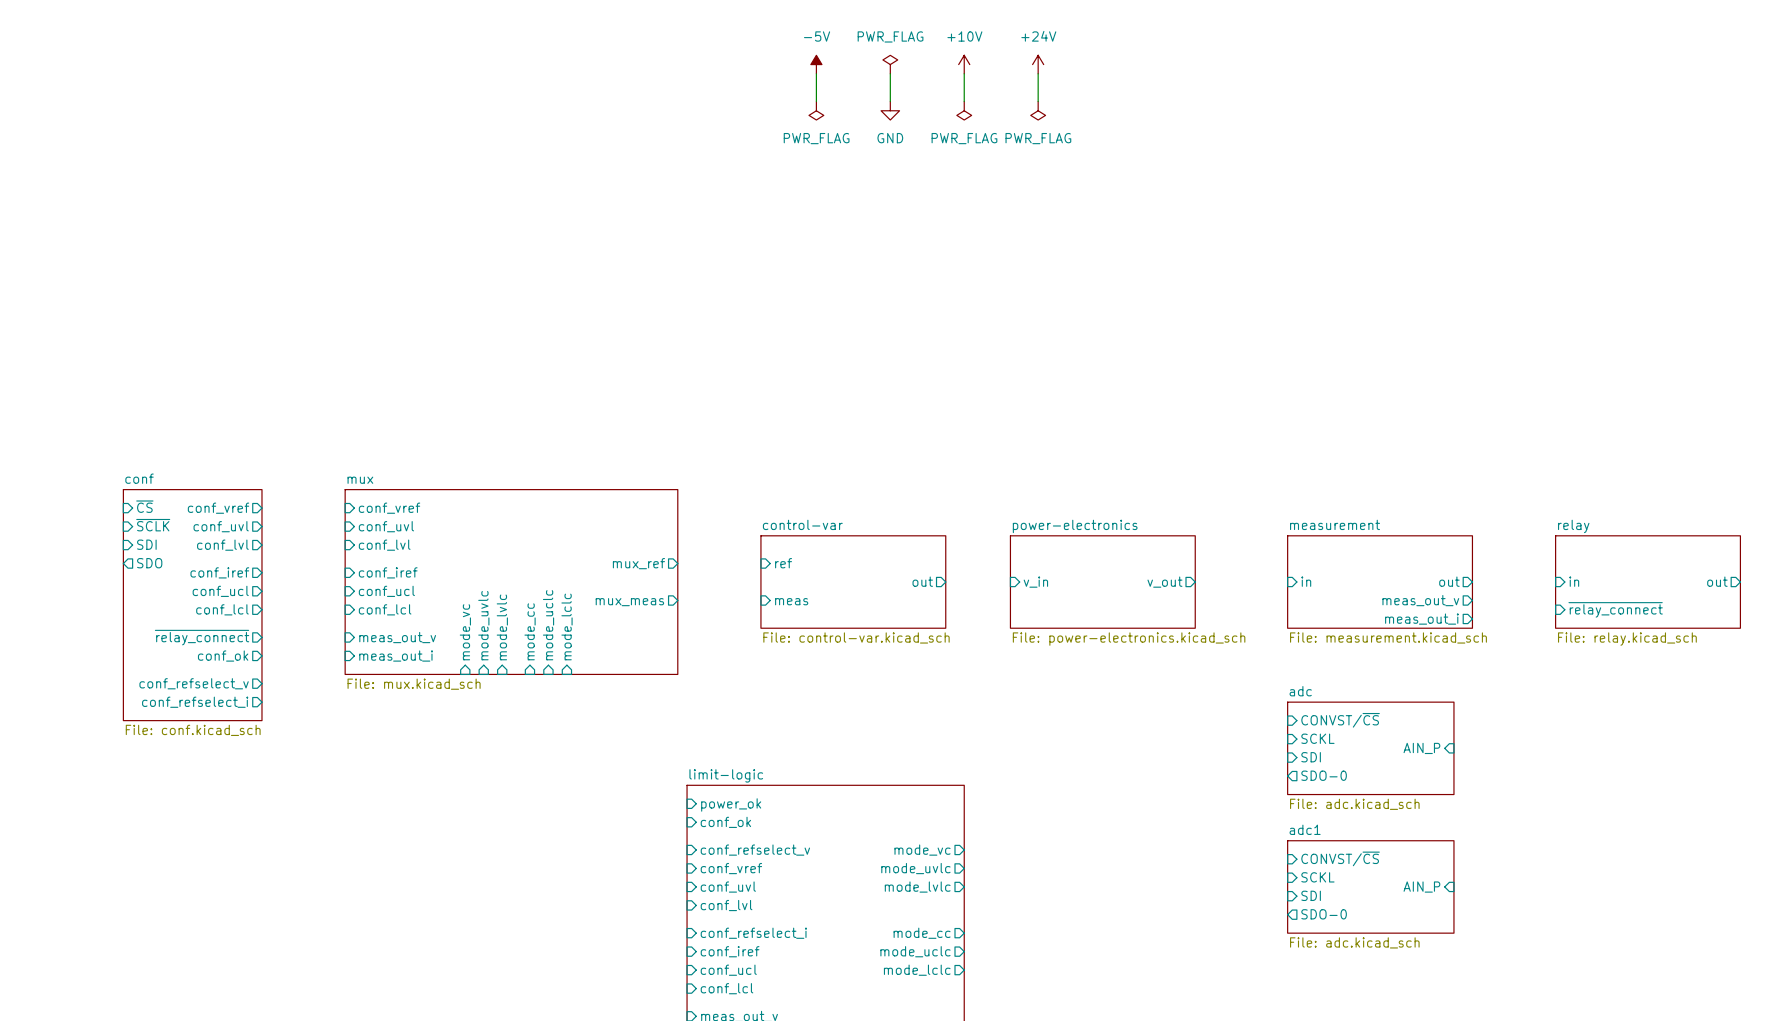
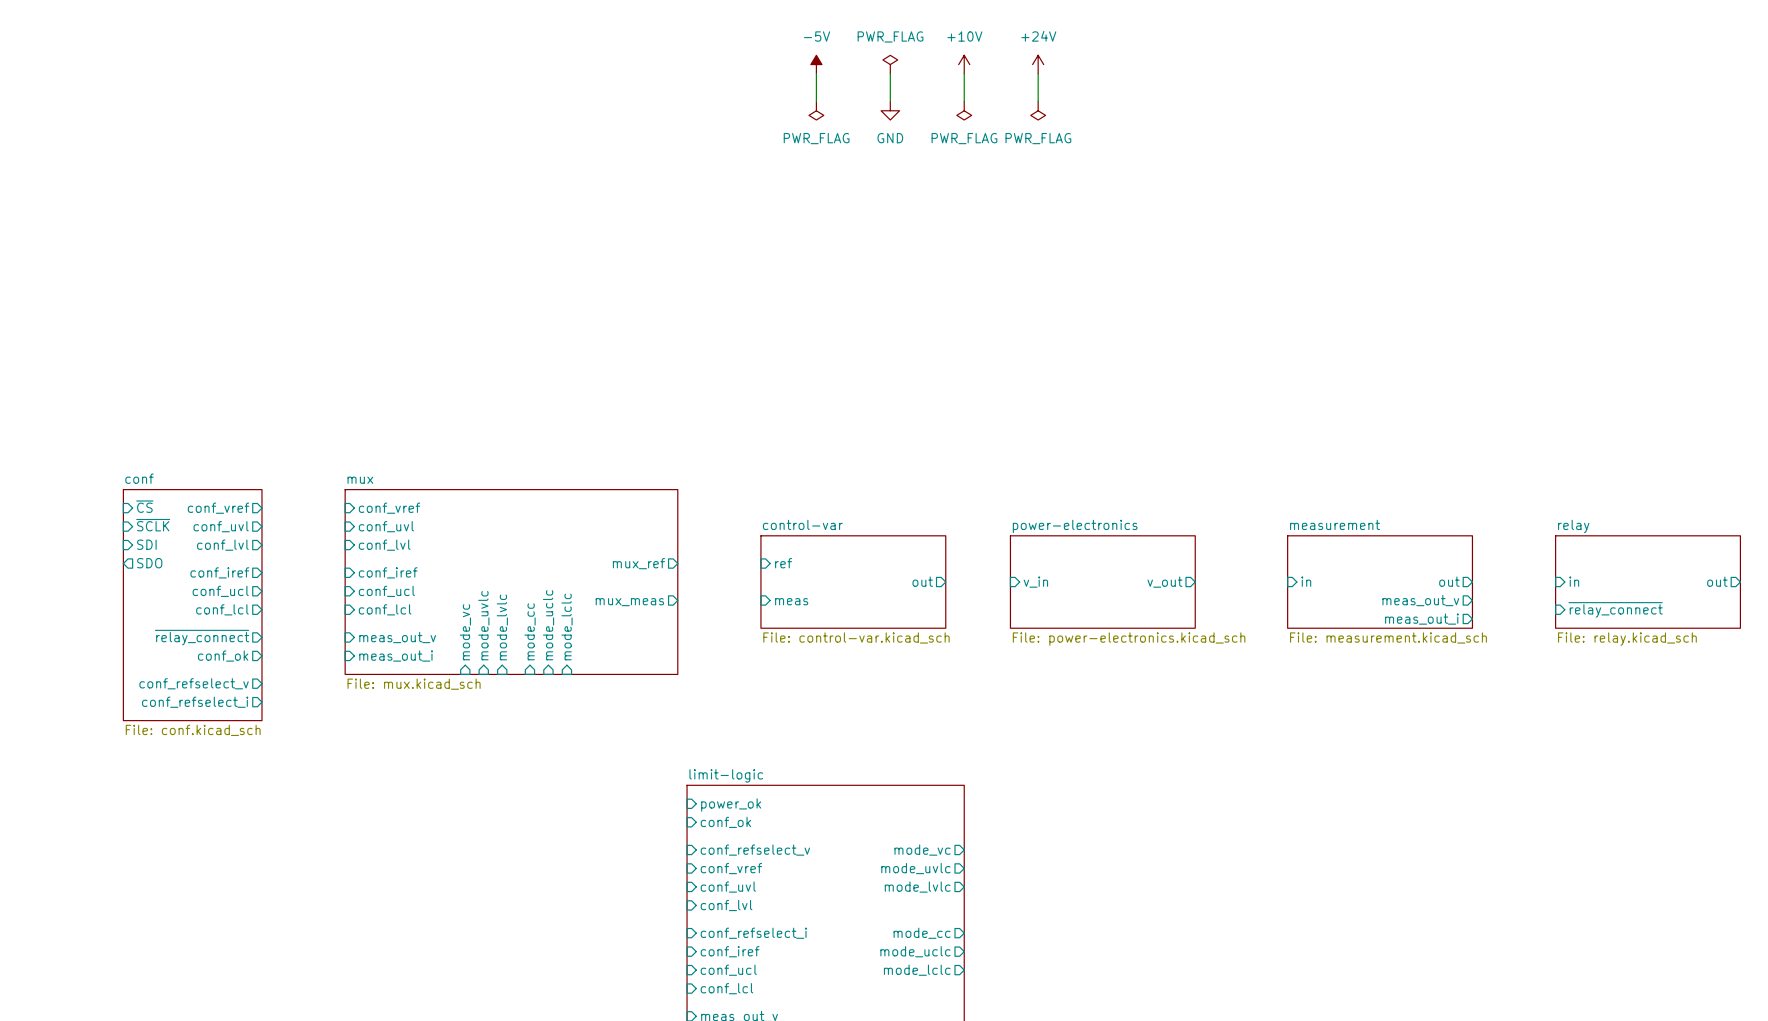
sheet pin: CONVST/~{CS} (1340, 720) -> none
sheet pin: SCKL (1317, 738) -> none
sheet adc: File: adc.kicad_sch (1370, 748) -> none
sheet pin: AIN_P (1421, 748) -> none
sheet pin: SDI (1311, 757) -> none
sheet pin: SDO-0 (1324, 775) -> none
sheet pin: CONVST/~{CS} (1340, 858) -> none
sheet pin: SCKL (1317, 877) -> none
sheet adc1: File: adc.kicad_sch (1370, 886) -> none
sheet pin: AIN_P (1421, 887) -> none
sheet pin: SDI (1311, 895) -> none
sheet pin: SDO-0 (1324, 914) -> none

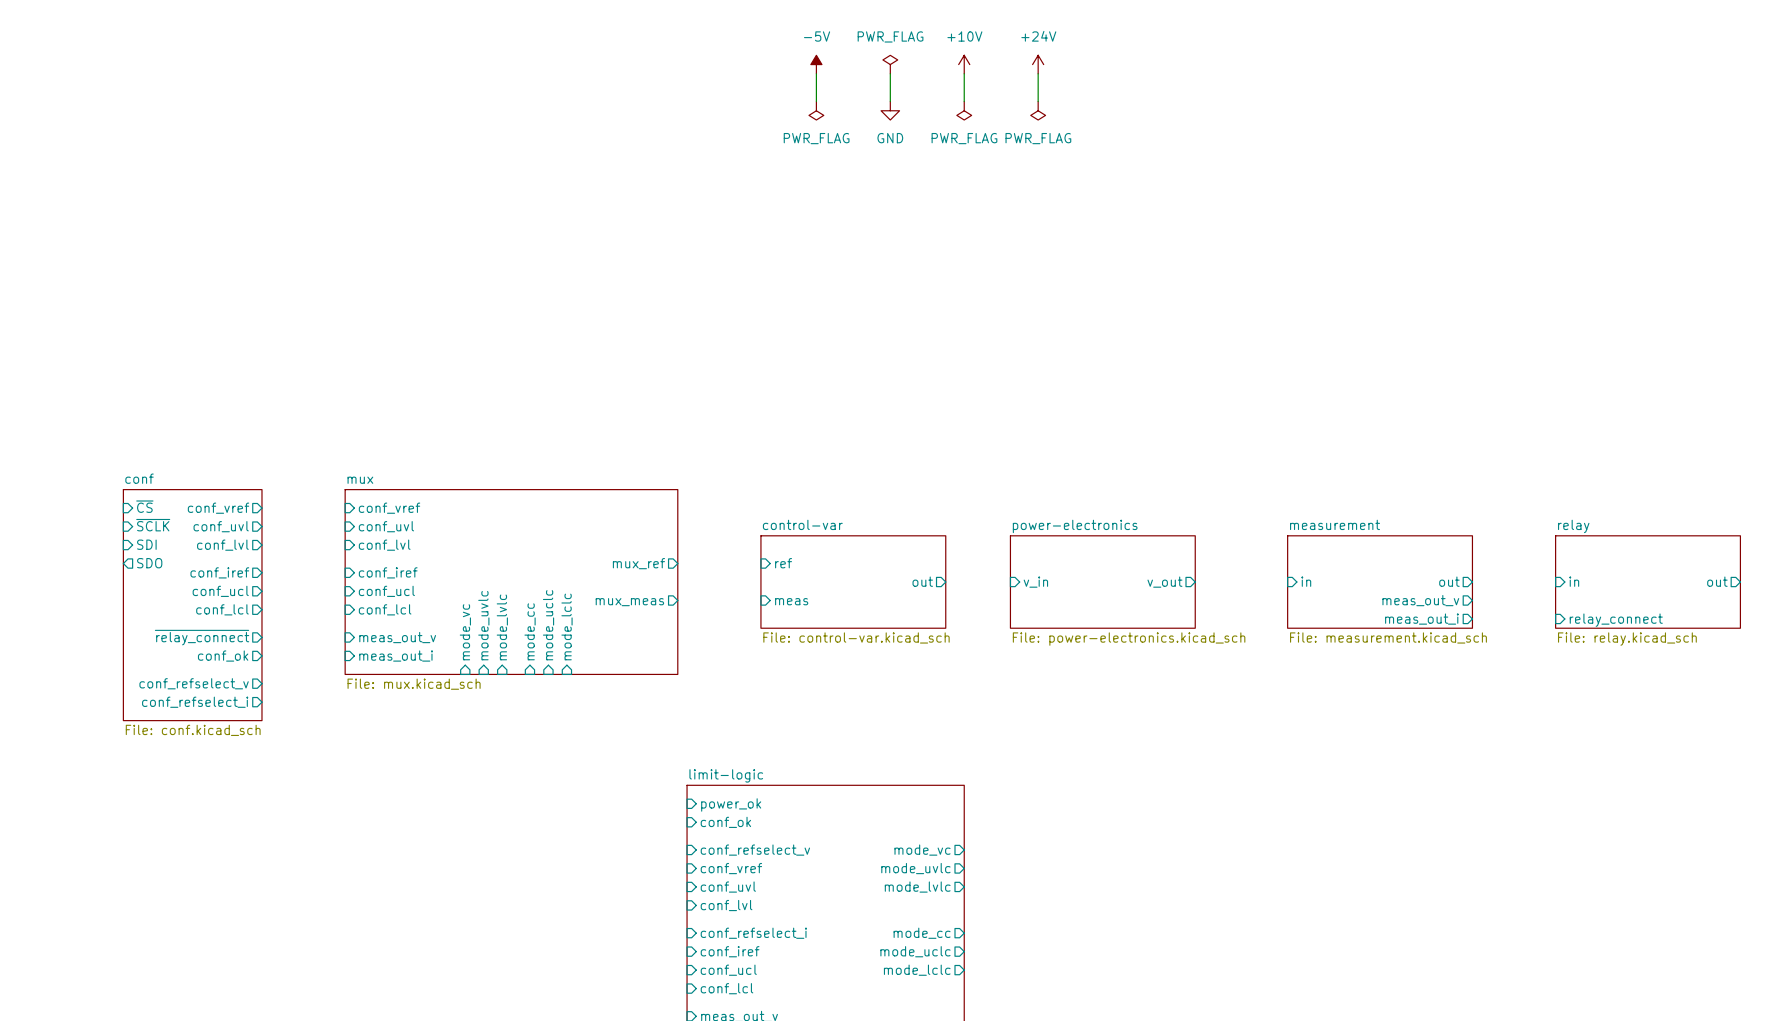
sheet pin: ~{relay_connect} (1615, 609) -> relay_connect (1616, 620)

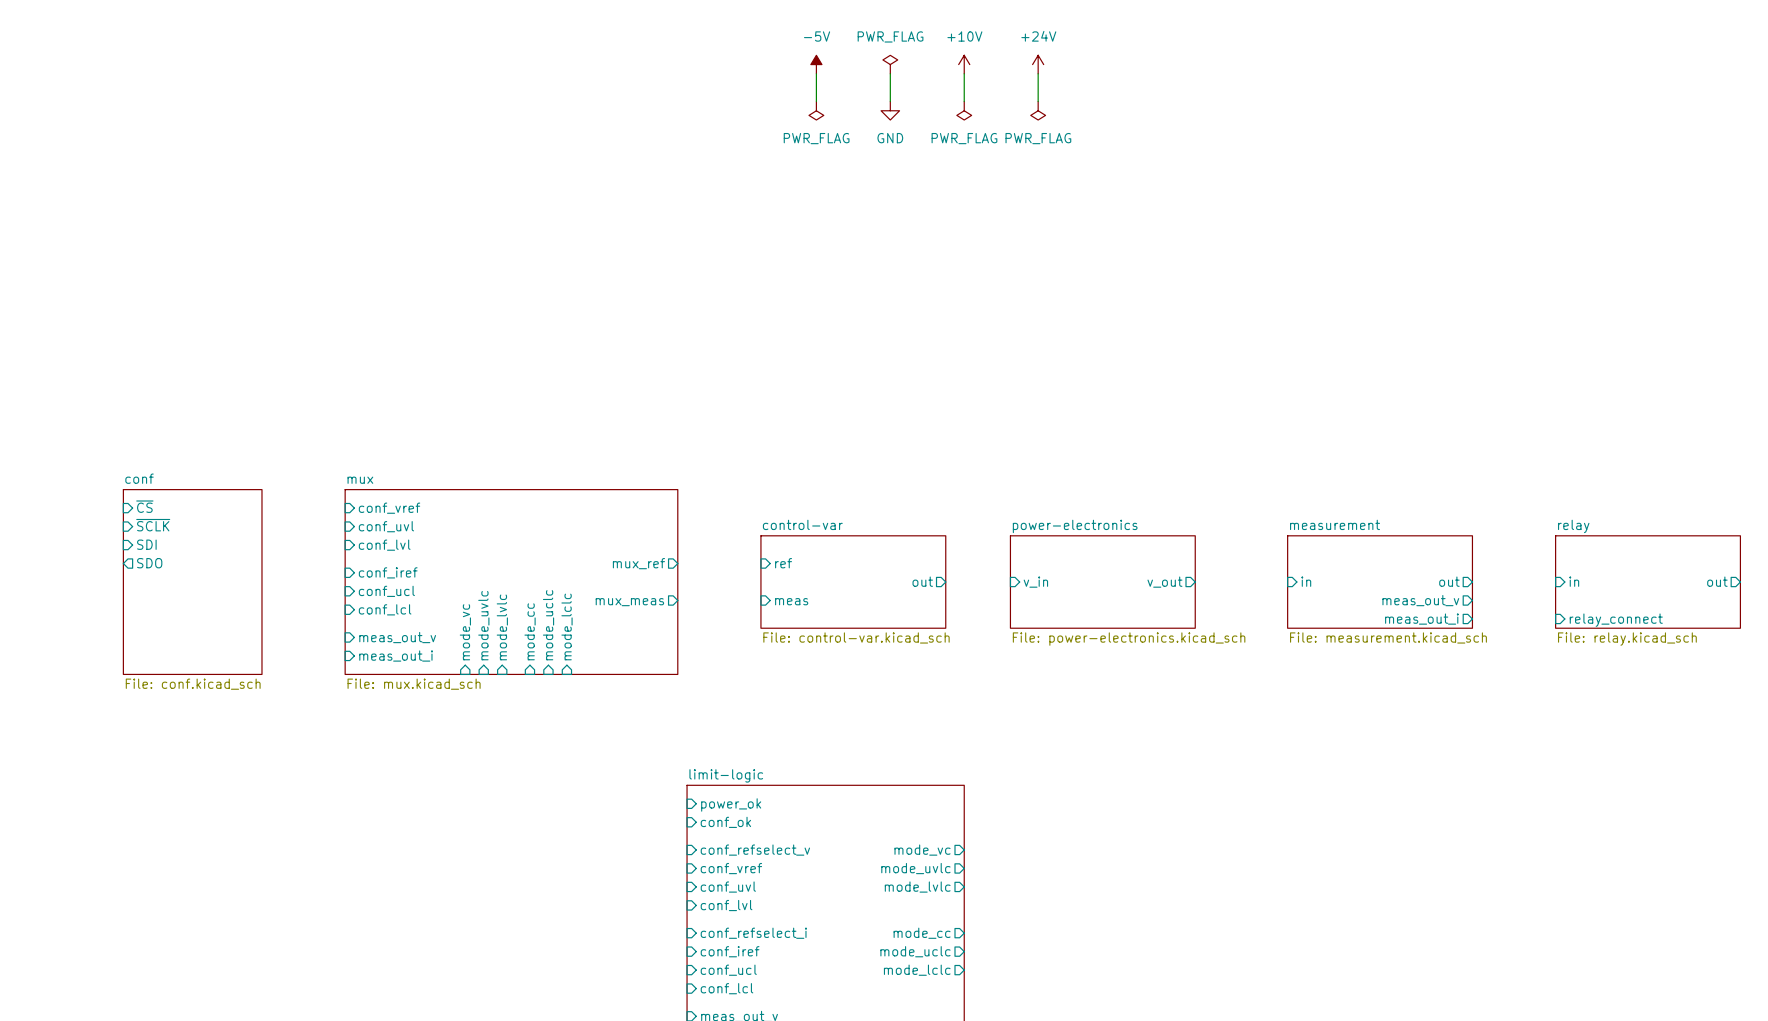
sheet pin: conf_vref (218, 508) -> none
sheet pin: conf_uvl (221, 526) -> none
sheet pin: conf_lvl (222, 545) -> none
sheet pin: conf_iref (219, 572) -> none
sheet conf: none -> File: conf.kicad_sch (192, 582)
sheet pin: conf_ucl (220, 591) -> none
sheet conf: File: conf.kicad_sch (192, 605) -> none
sheet pin: conf_lcl (222, 609) -> none
sheet pin: ~{relay_connect} (202, 637) -> none
sheet pin: conf_ok (223, 656) -> none
sheet pin: conf_refselect_v (194, 683) -> none
sheet pin: conf_refselect_i (195, 702) -> none

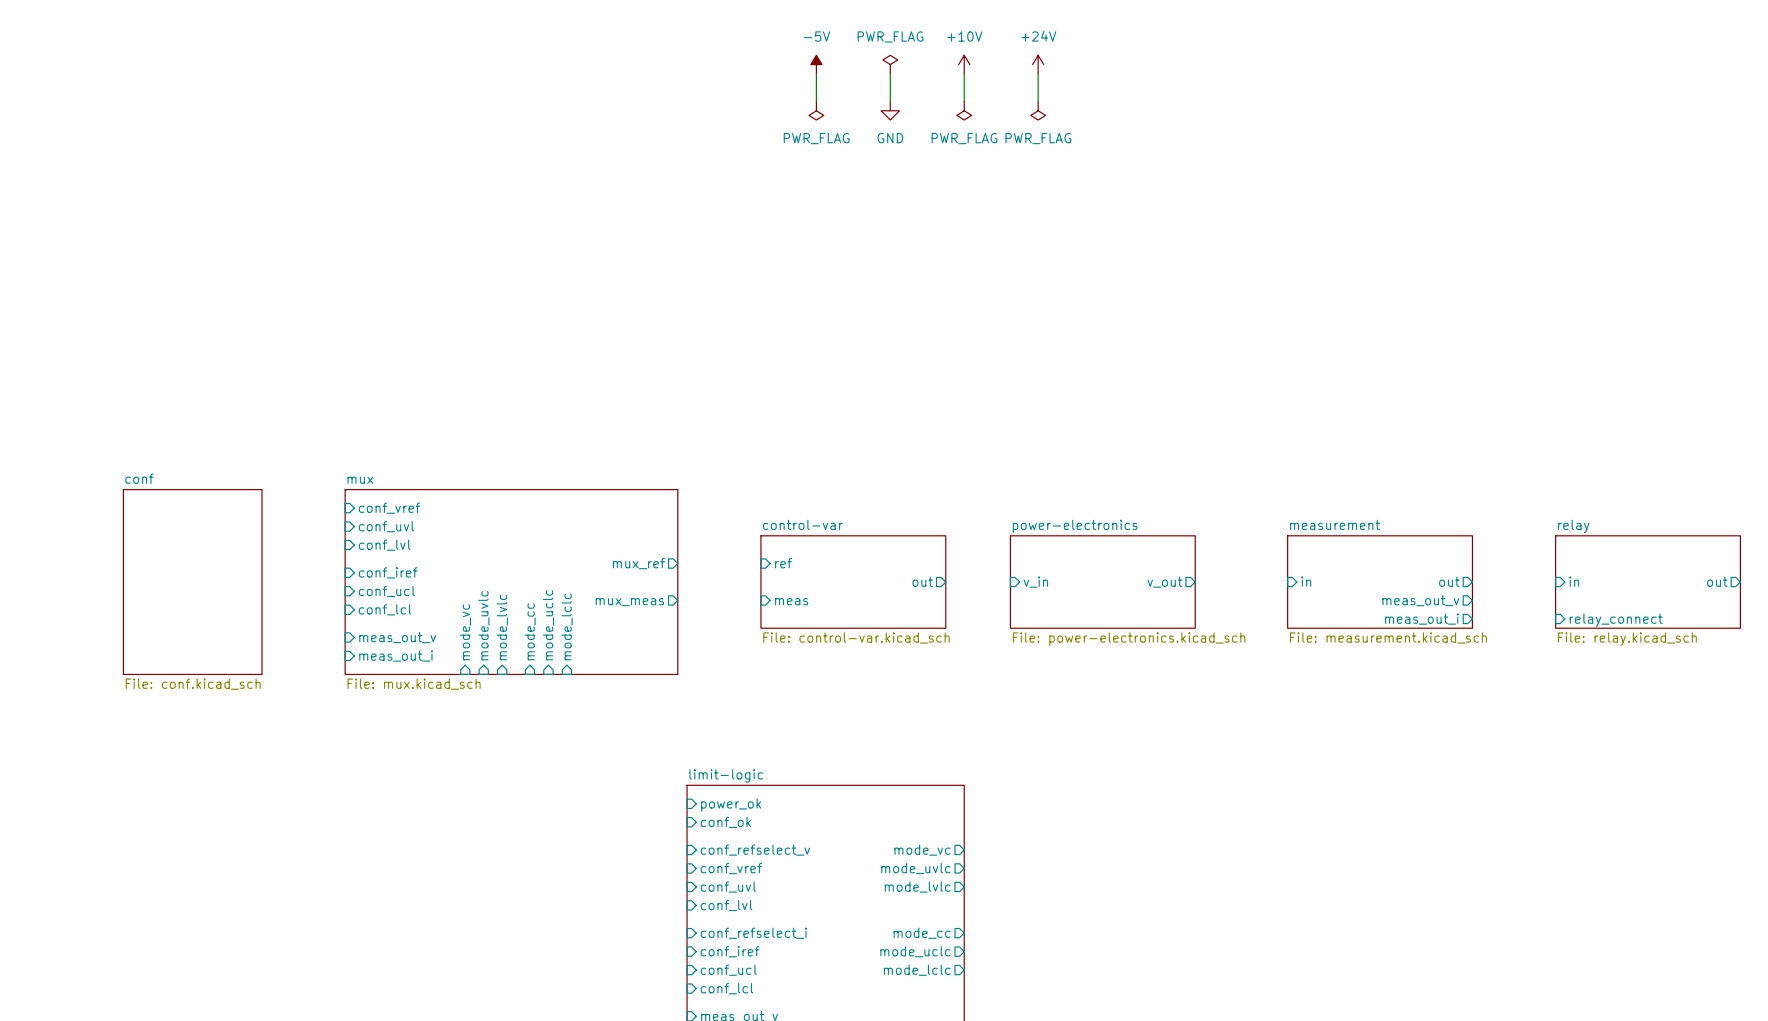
sheet pin: ~{CS} (144, 506) -> none
sheet pin: ~{SCLK} (153, 525) -> none
sheet pin: SDI (146, 544) -> none
sheet pin: SDO (149, 563) -> none

